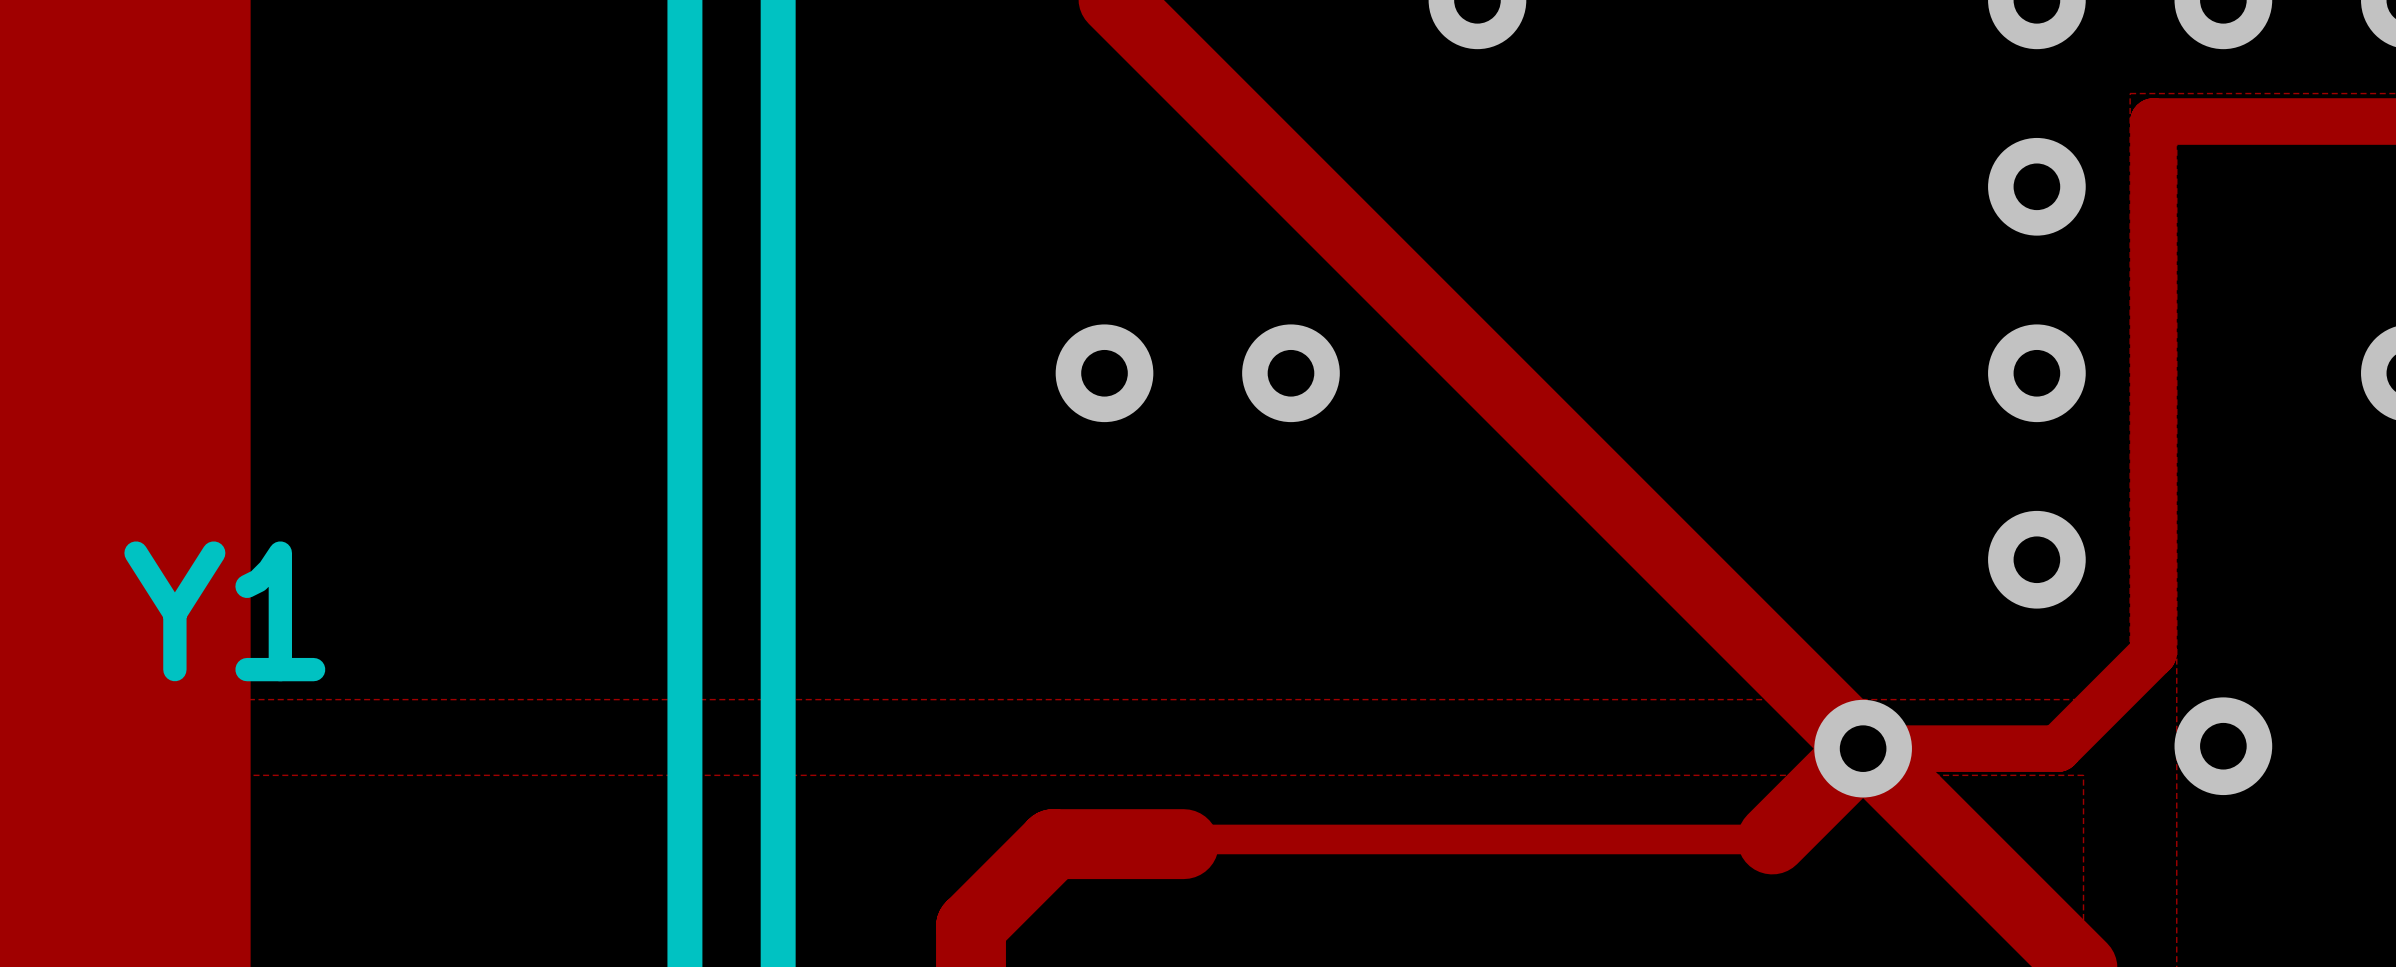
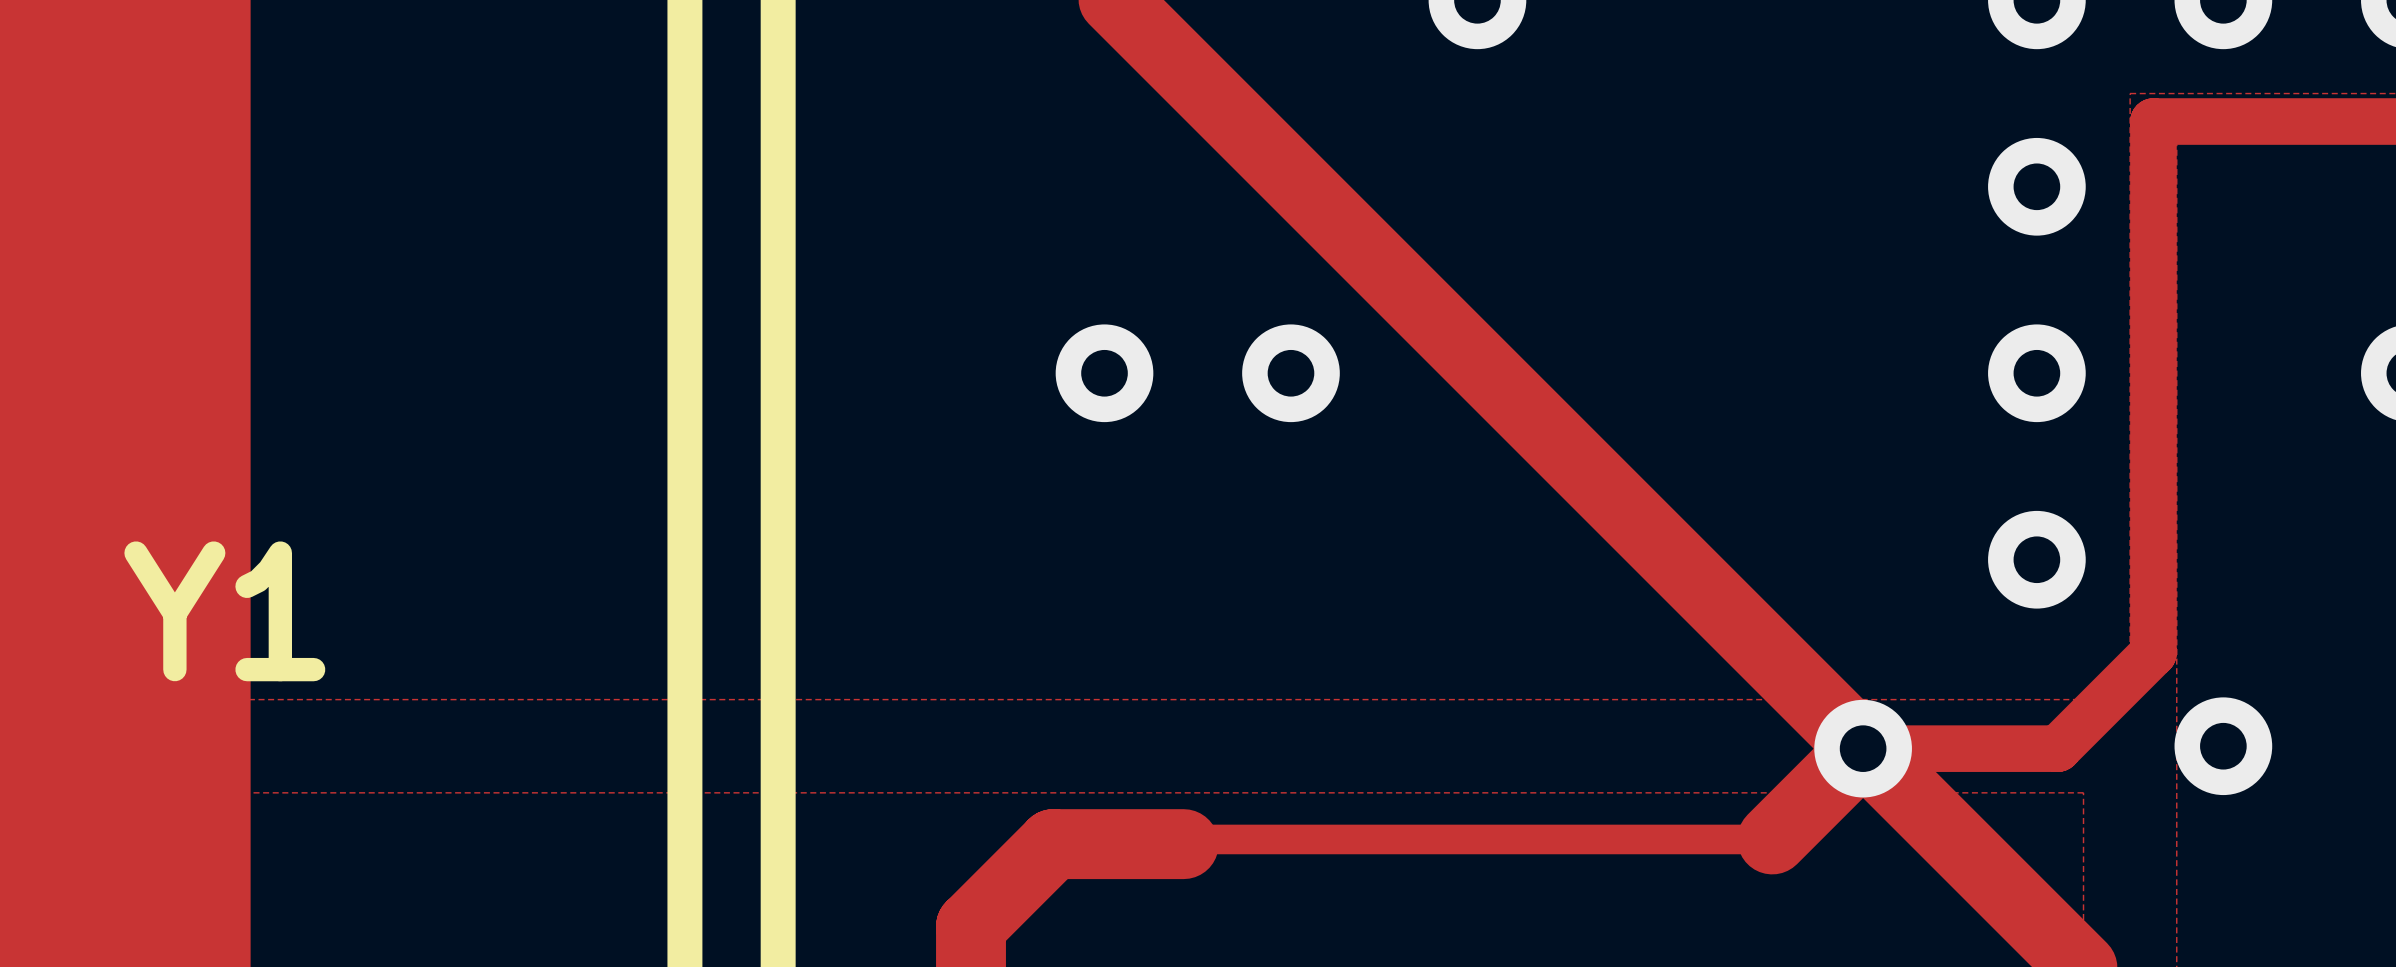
zone outline: (32, 775) (2083, 775) (2083, 792) -> (32, 775) (32, 792) (2083, 792)

